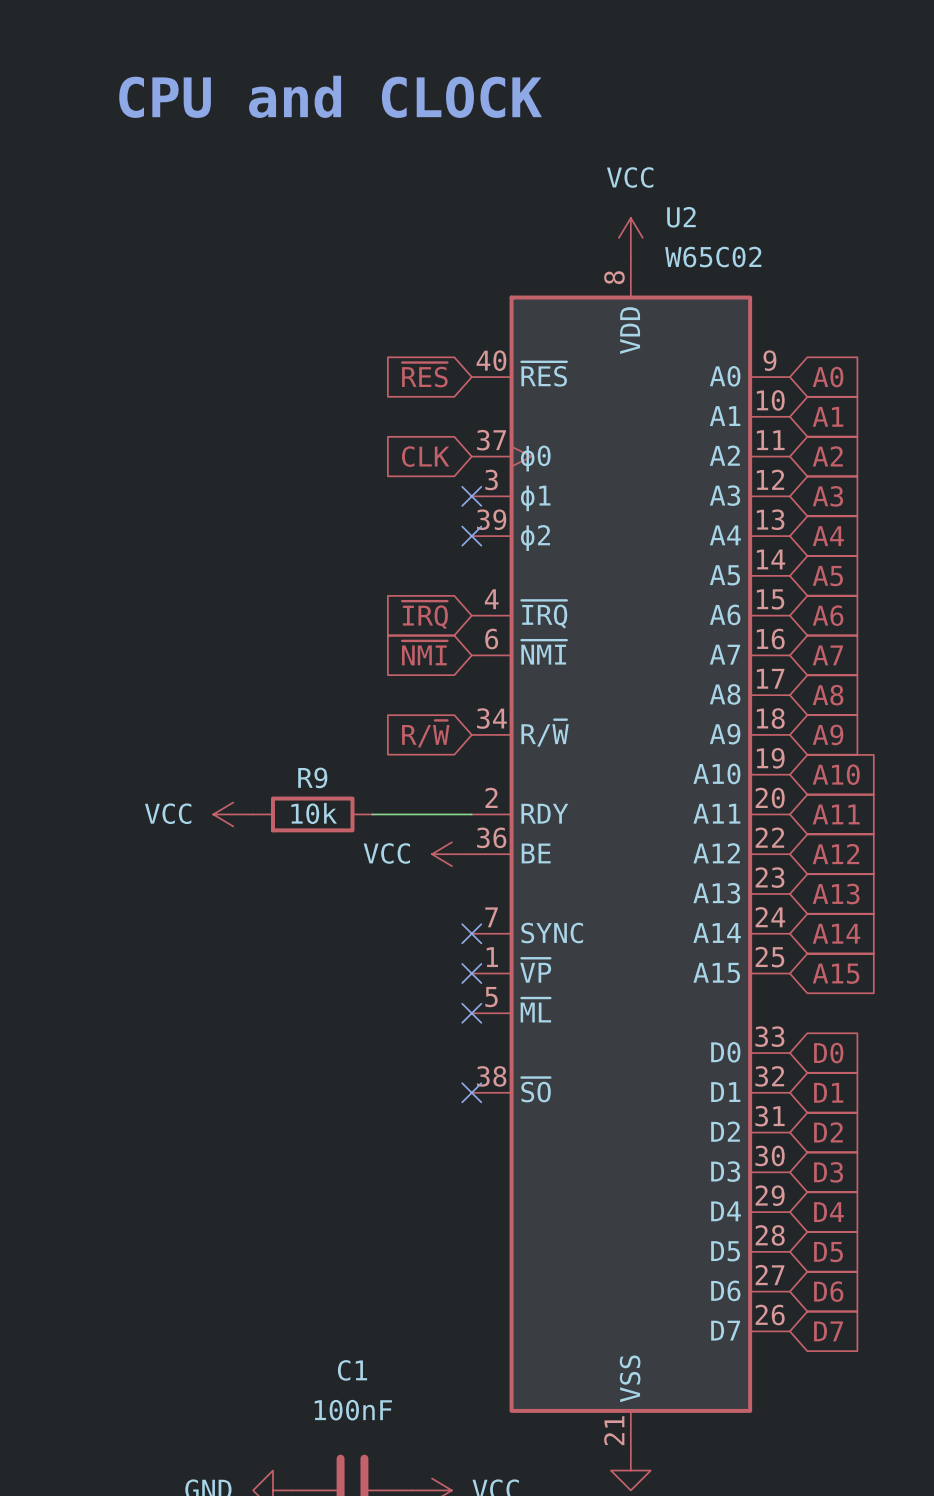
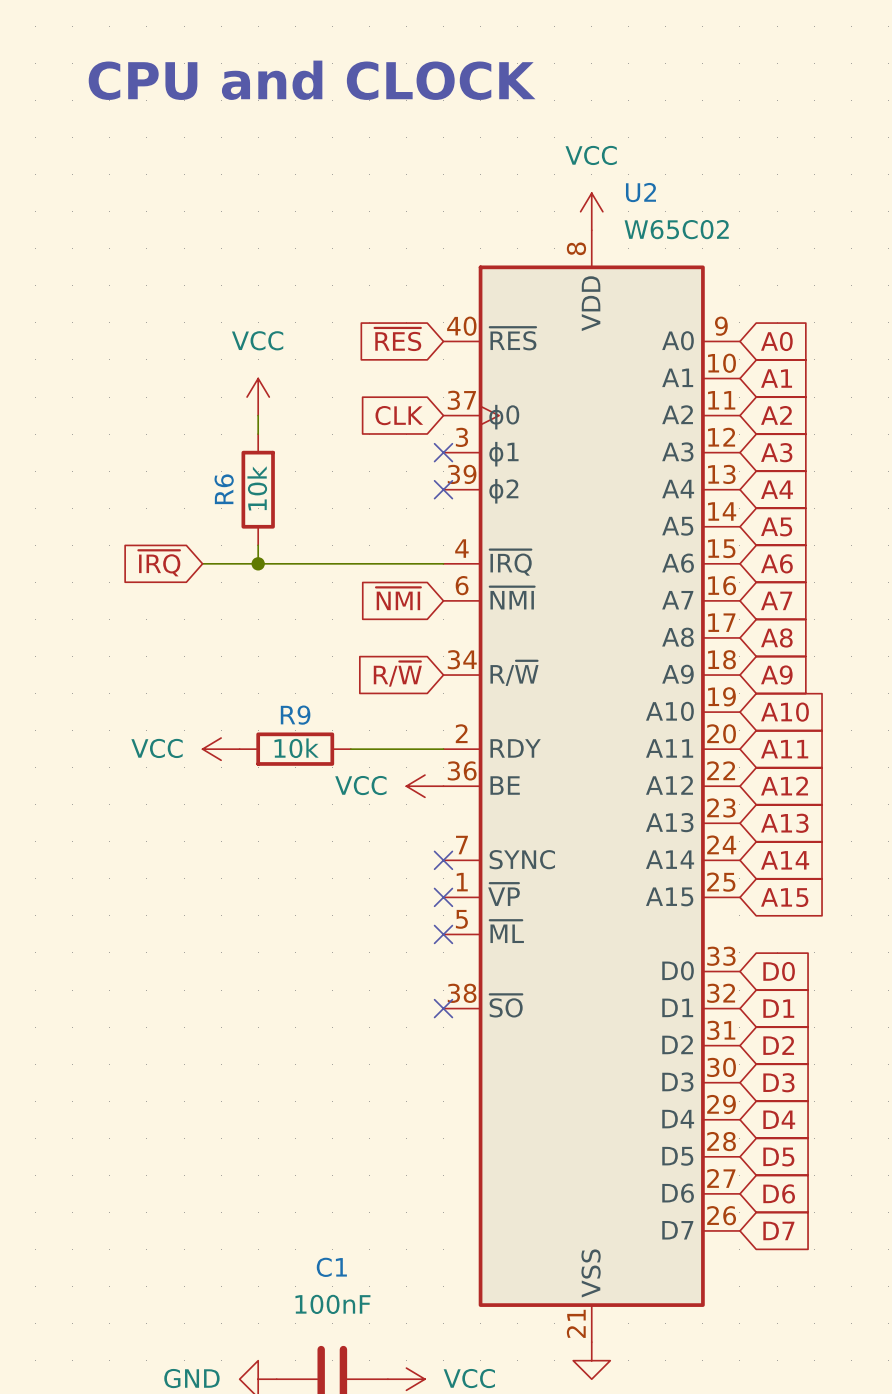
power symbol: none -> VCC (258, 397)
wire: none -> (258, 415) (258, 434)
R6: none -> 10k (258, 489)
wire: none -> (258, 545) (258, 563)
wire: none -> (202, 563) (443, 563)
junction: none -> (258, 563)
global label position: ~{IRQ} (425, 615) -> ~{IRQ} (159, 563)

